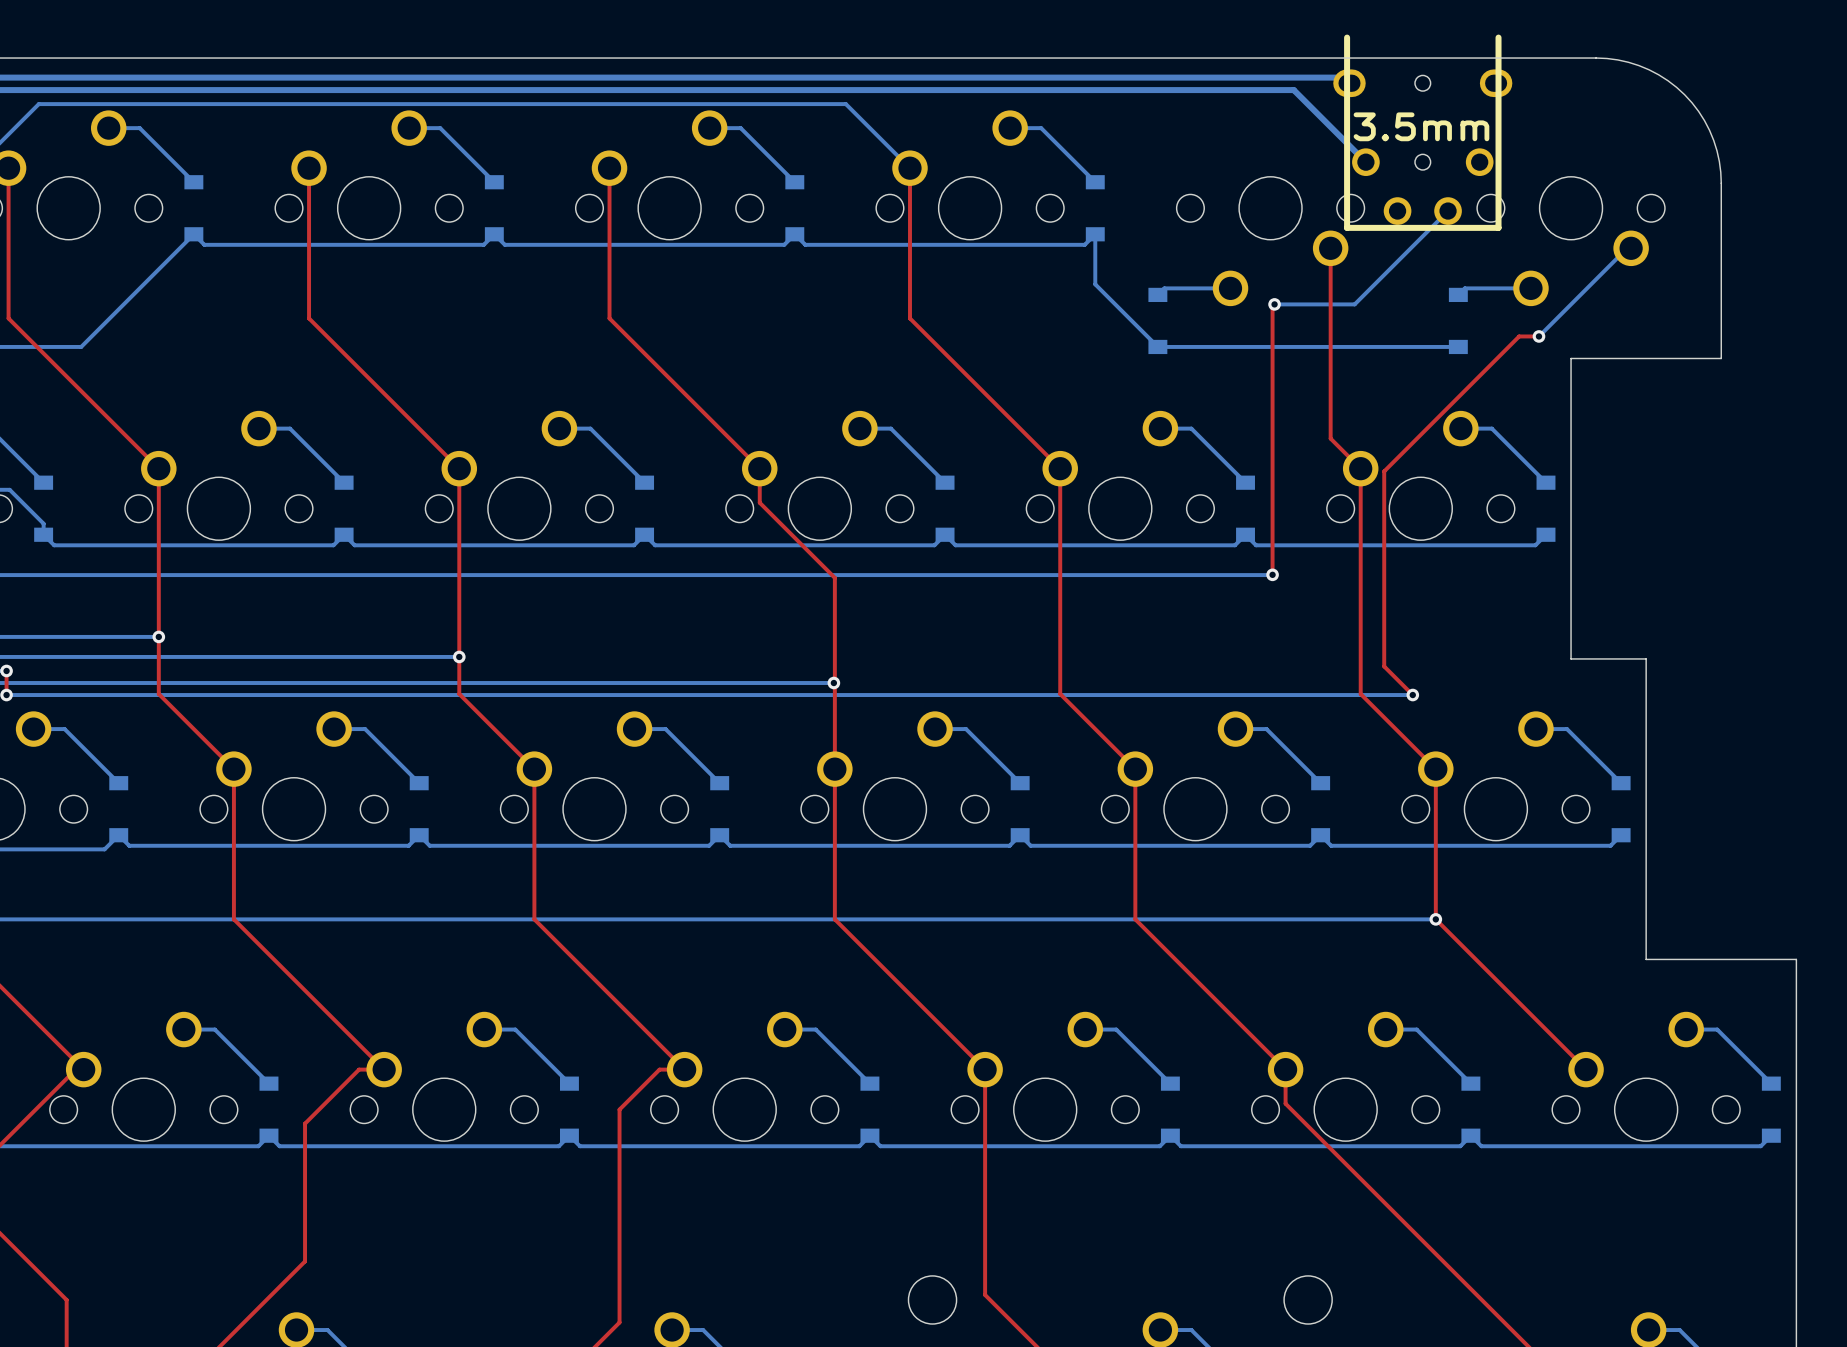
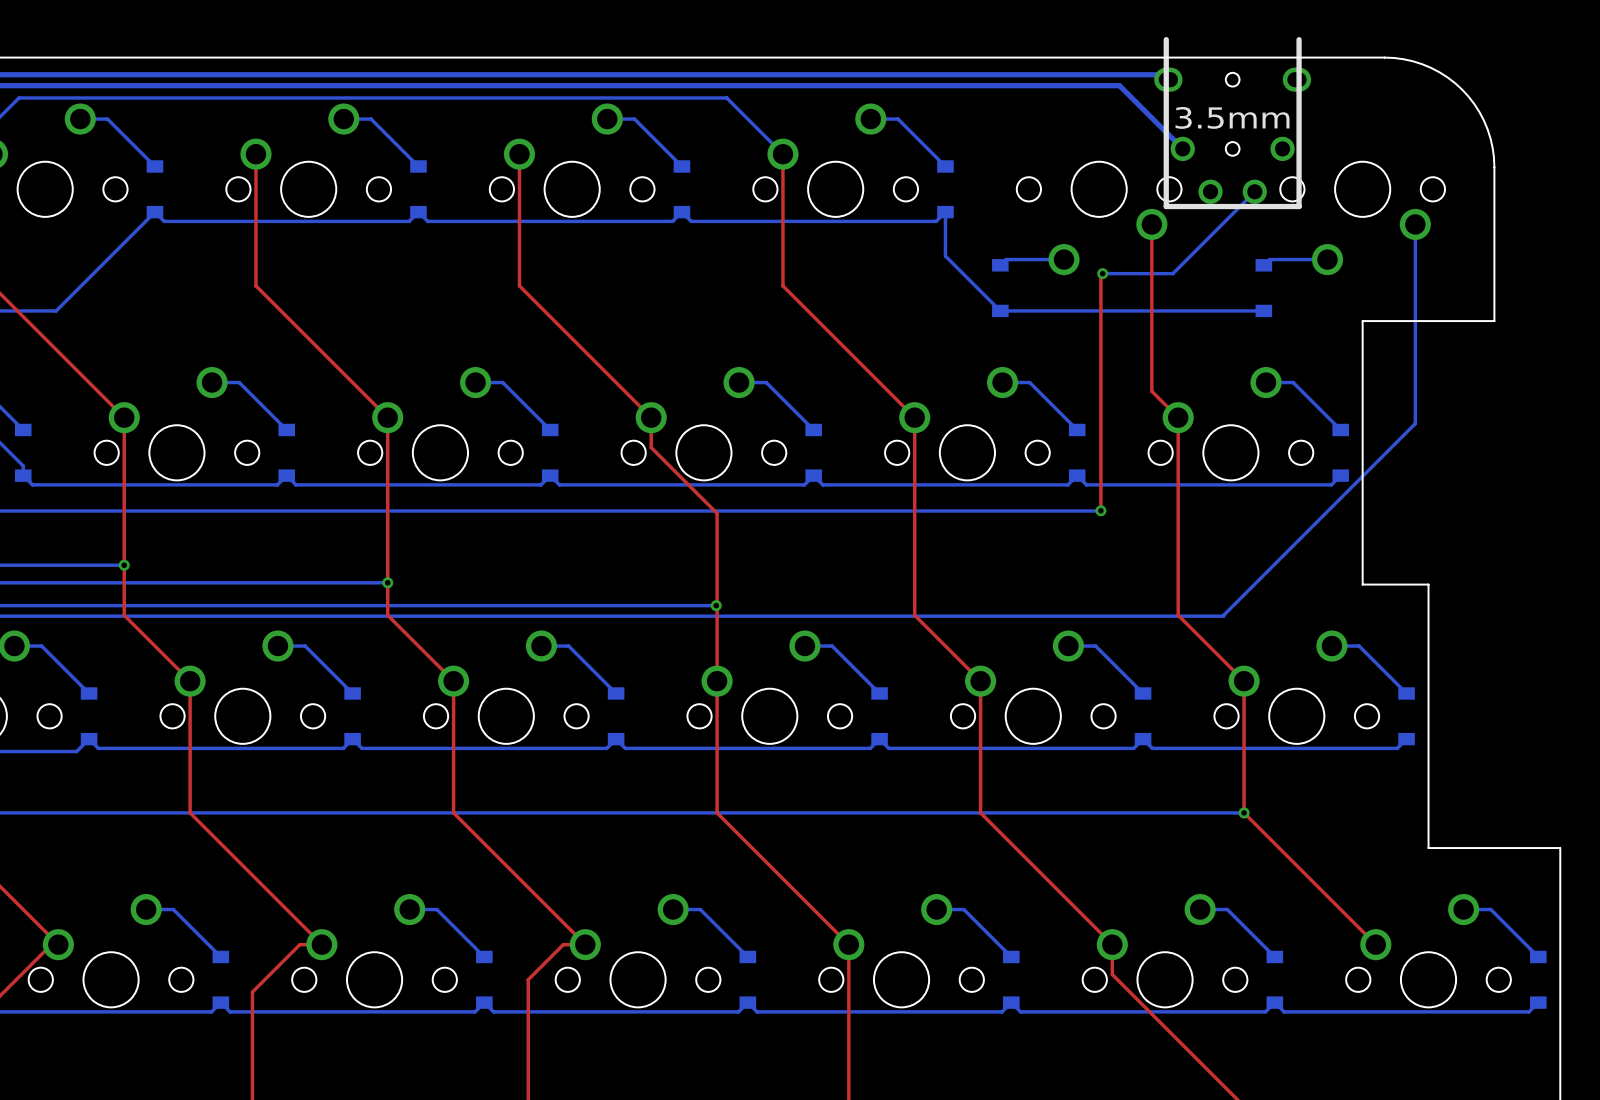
bottom track: (1631, 248) (1627, 248) (1538, 336) -> (1415, 224) (1415, 423) (1222, 616)
top track: (1538, 336) (1519, 336) (1384, 471) (1384, 666) (1412, 695) -> none
via: (1538, 336) -> none
via: (1412, 695) -> none

